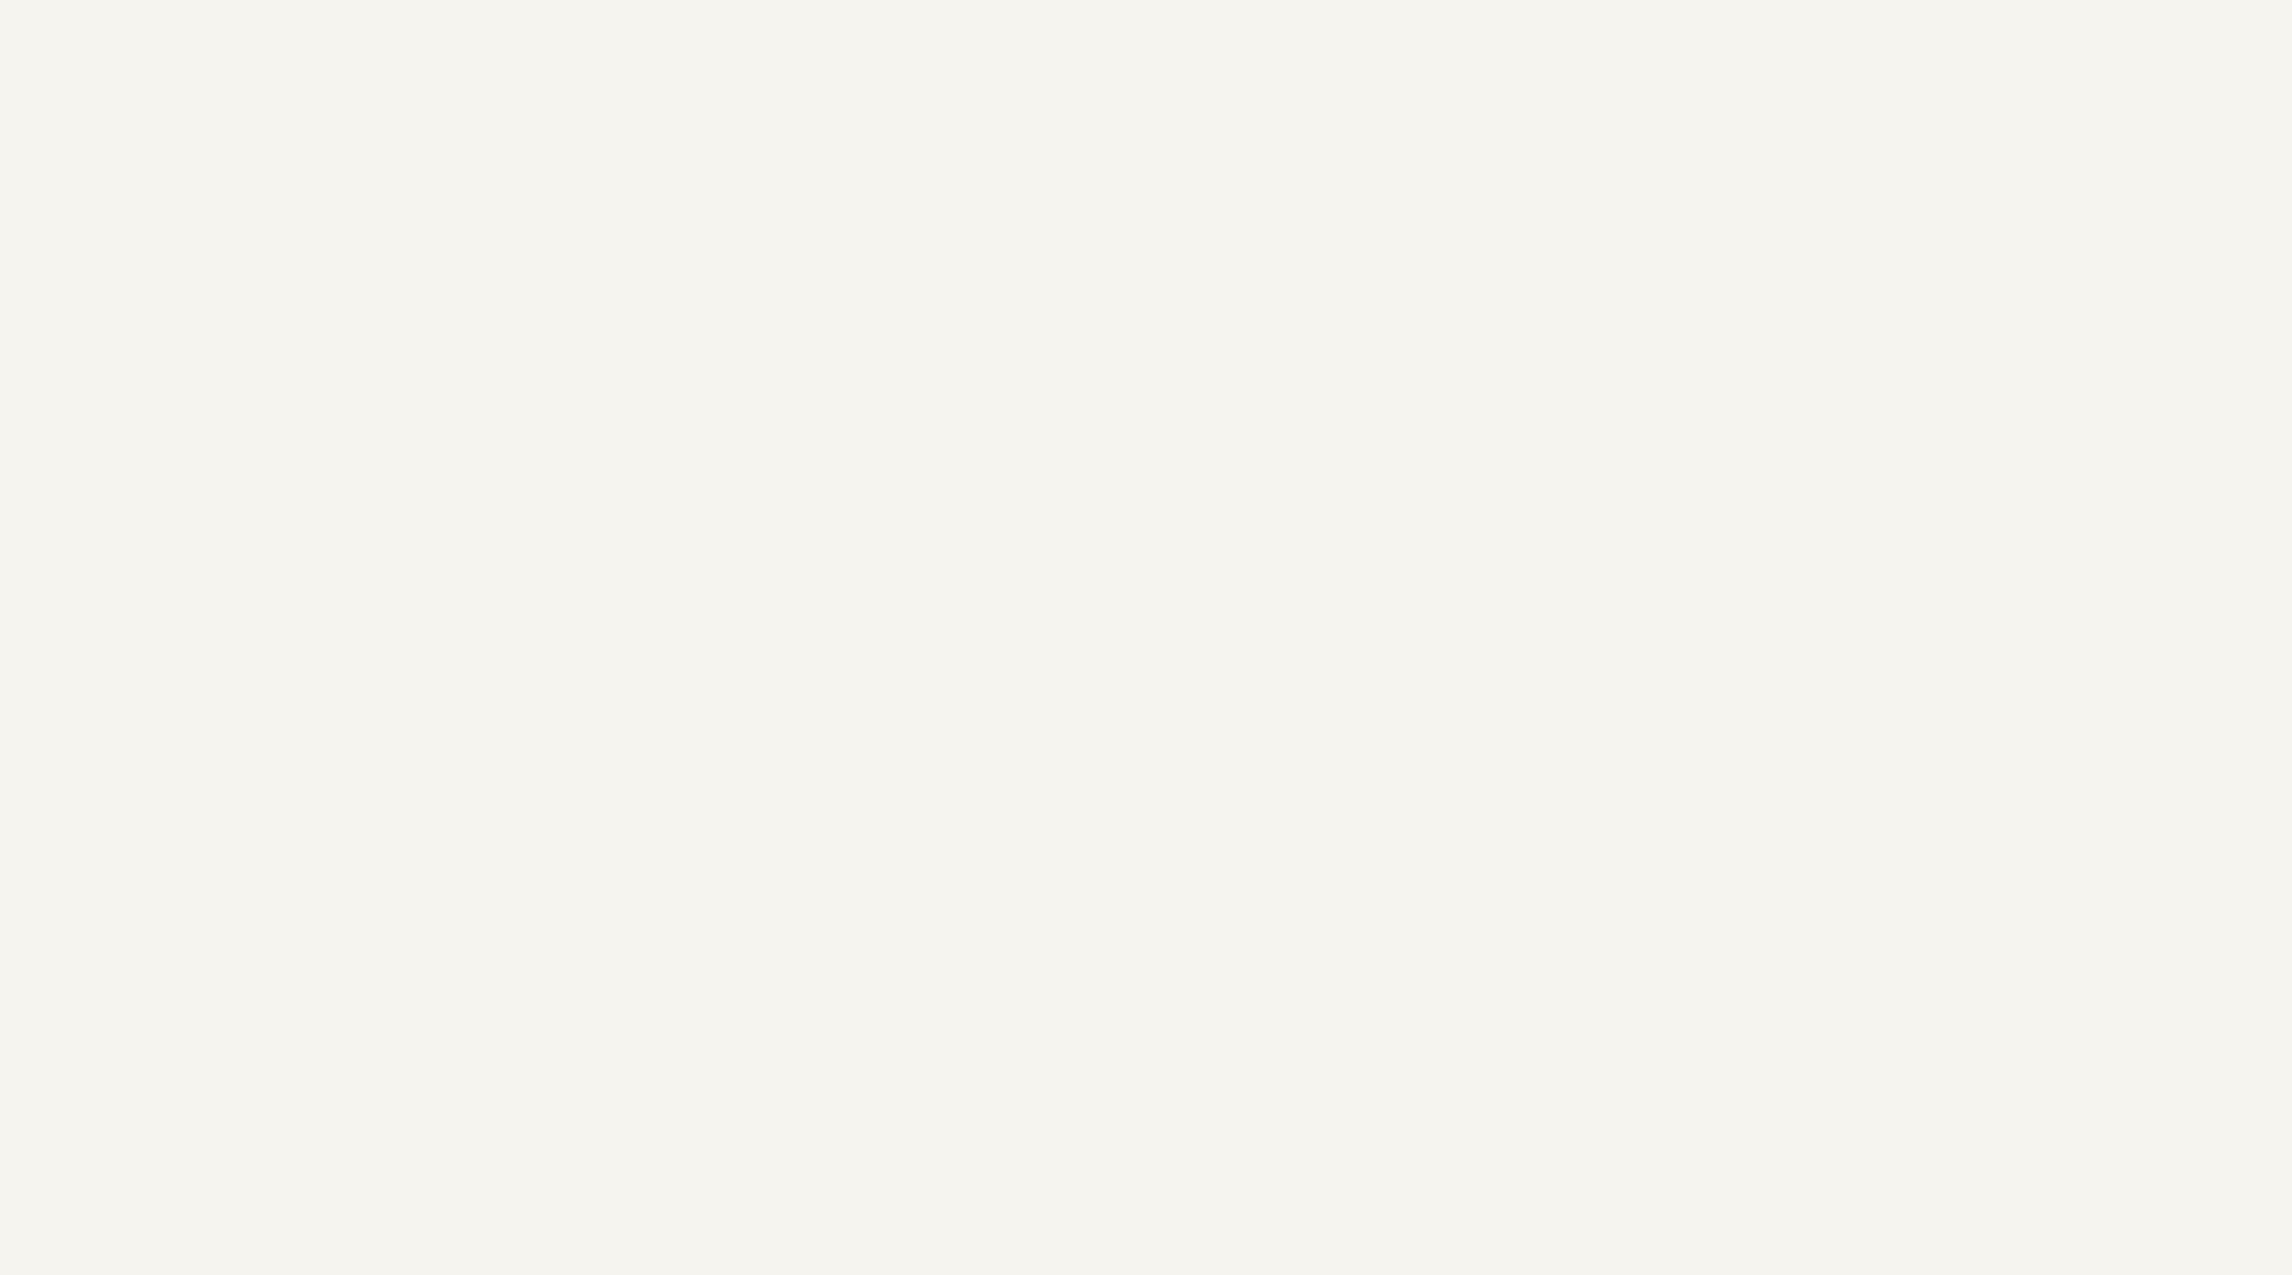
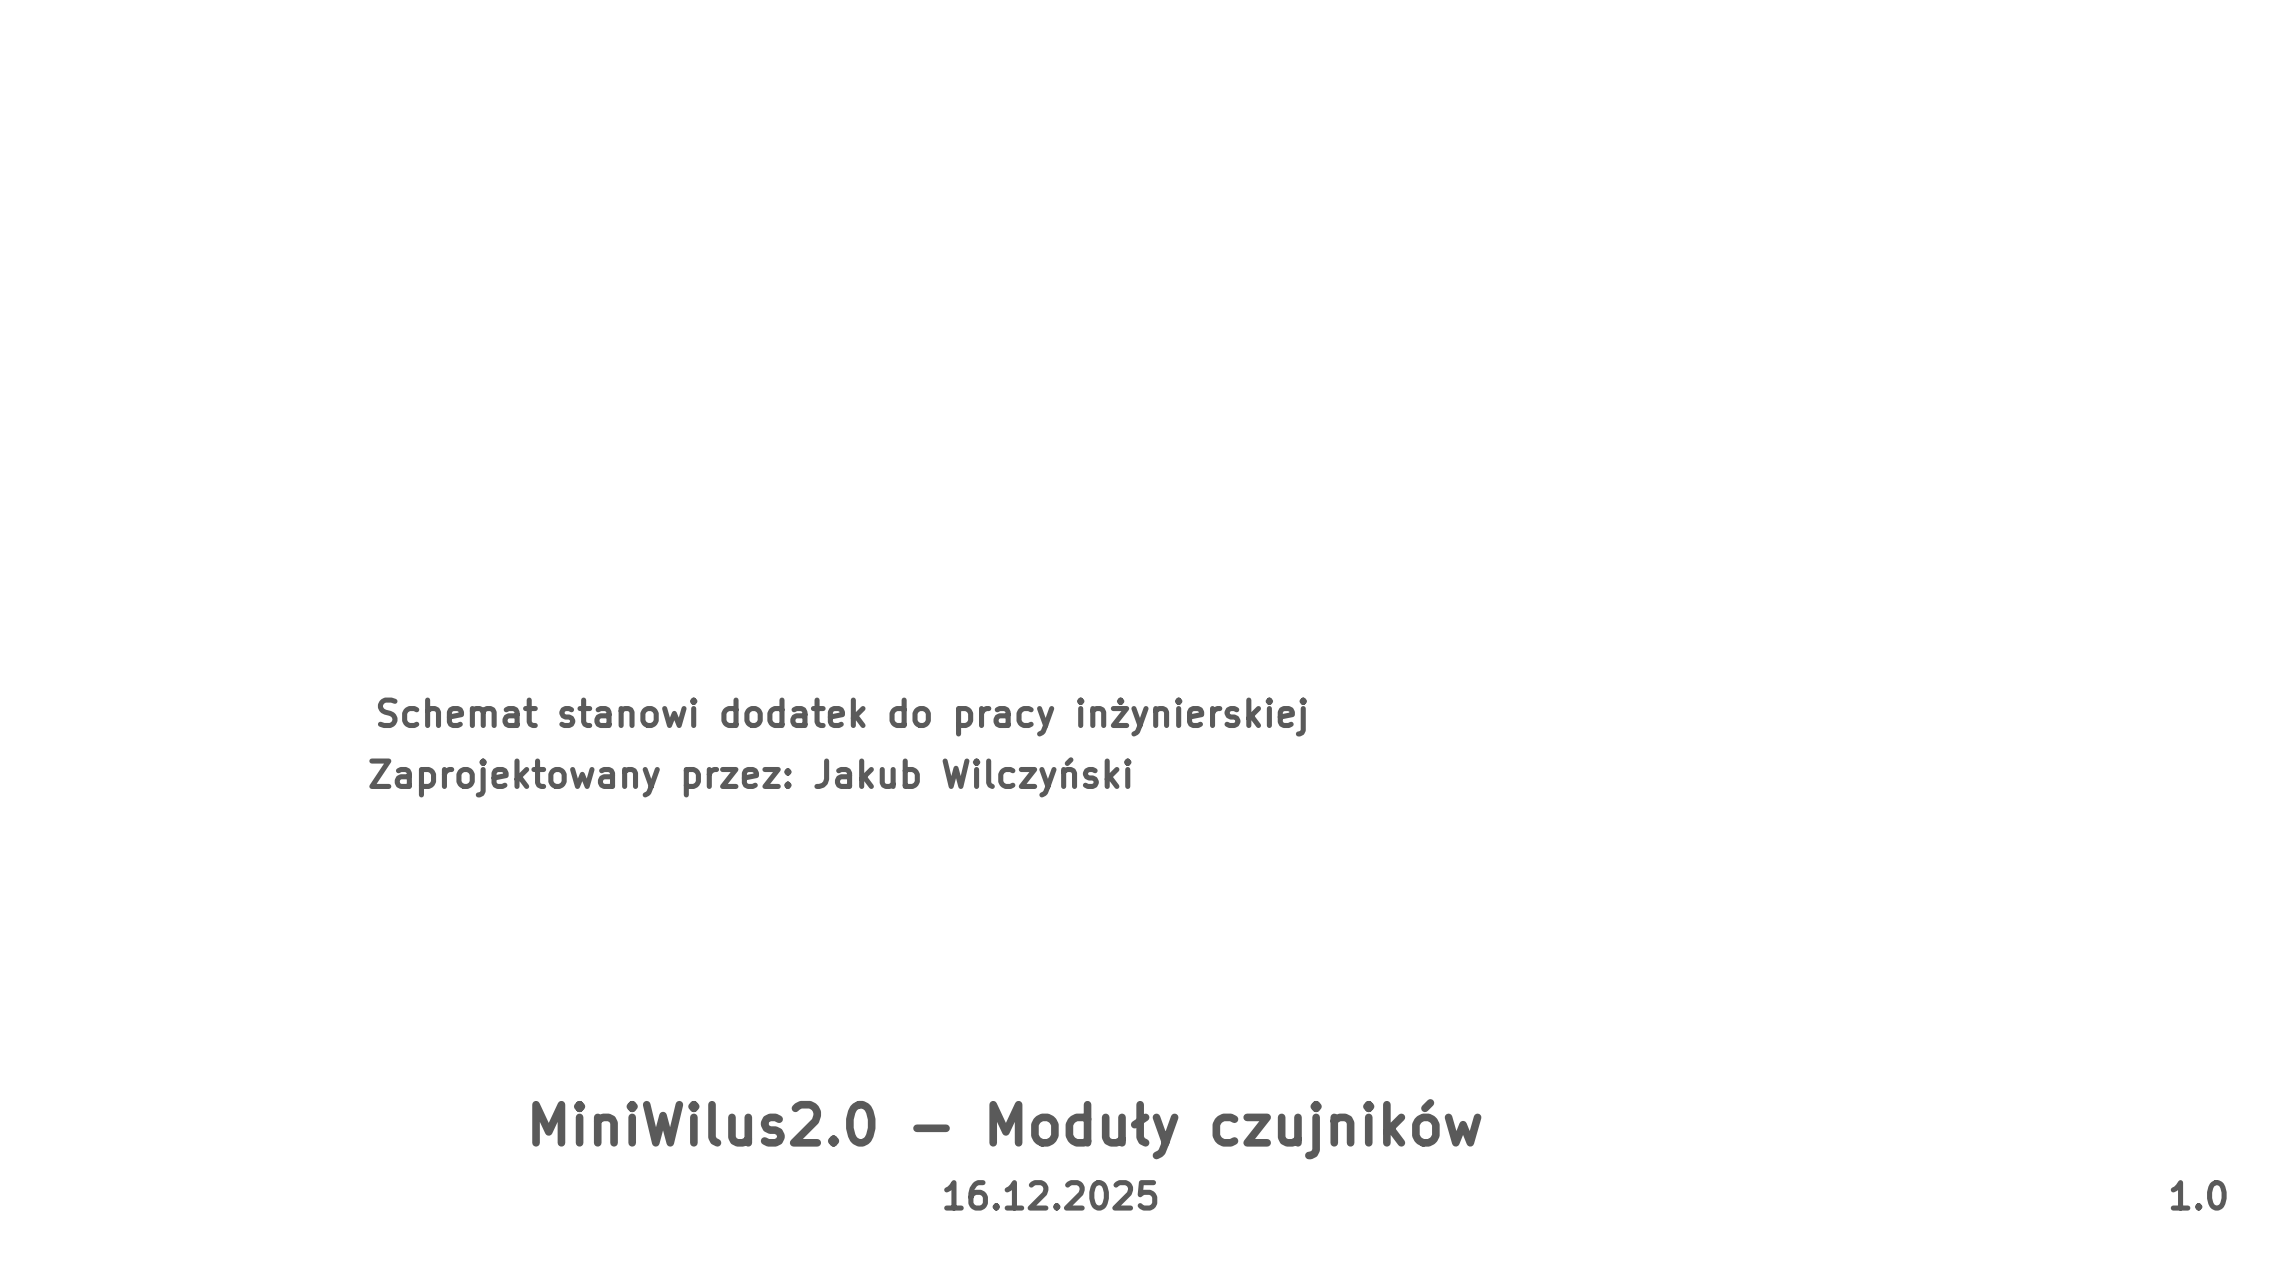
text: none -> Schemat stanowi dodatek do pracy inżynierskiej (842, 717)
text: none -> Zaprojektowany przez: Jakub Wilczyński (750, 777)
text: none -> MiniWilus2.0 - Moduły czujników (1006, 1129)
text: none -> 16.12.2025 (1050, 1195)
text: none -> 1.0 (2198, 1195)

